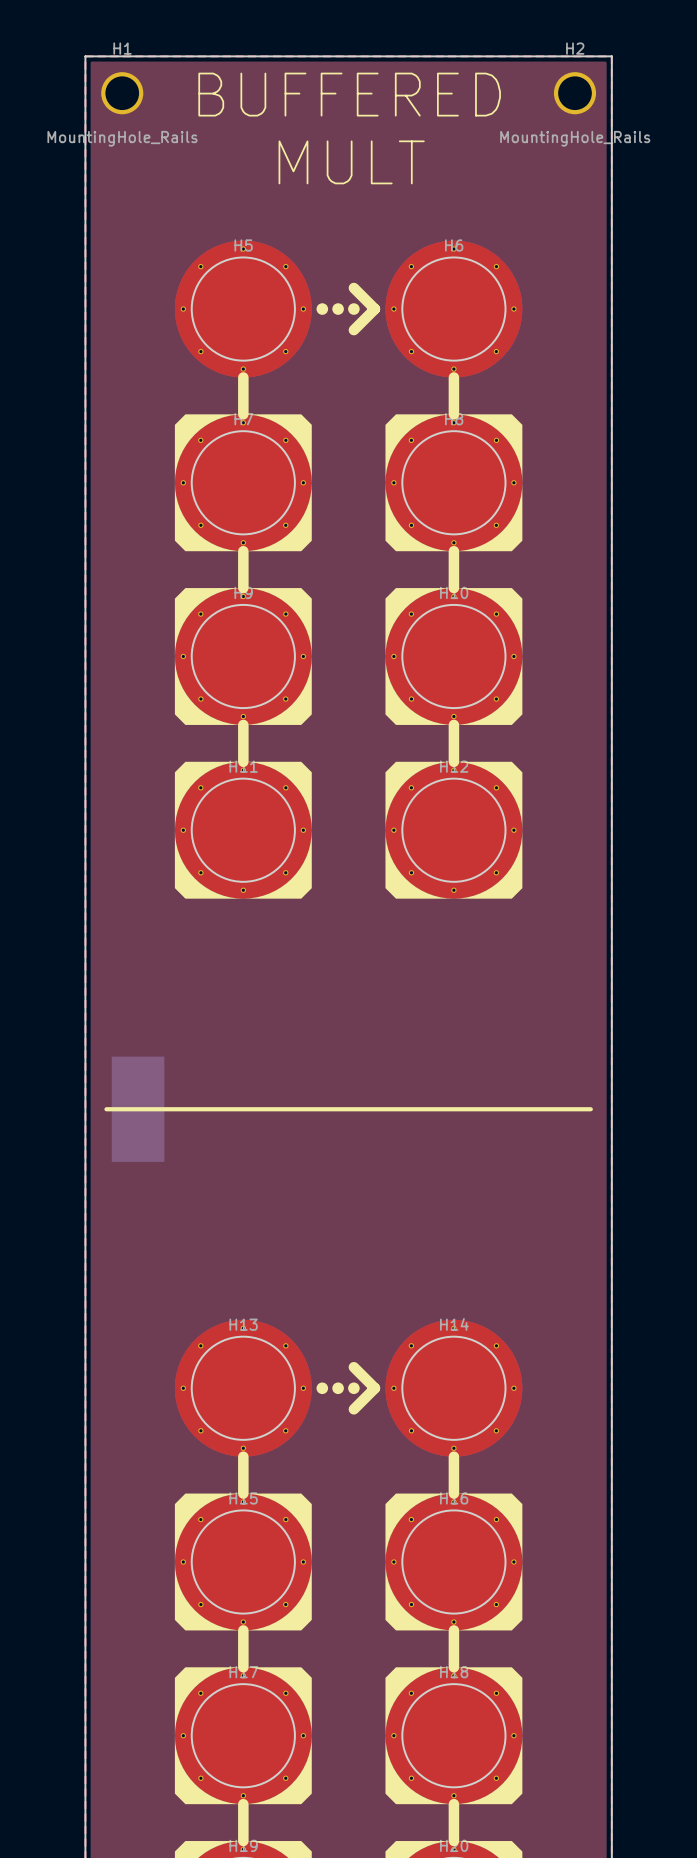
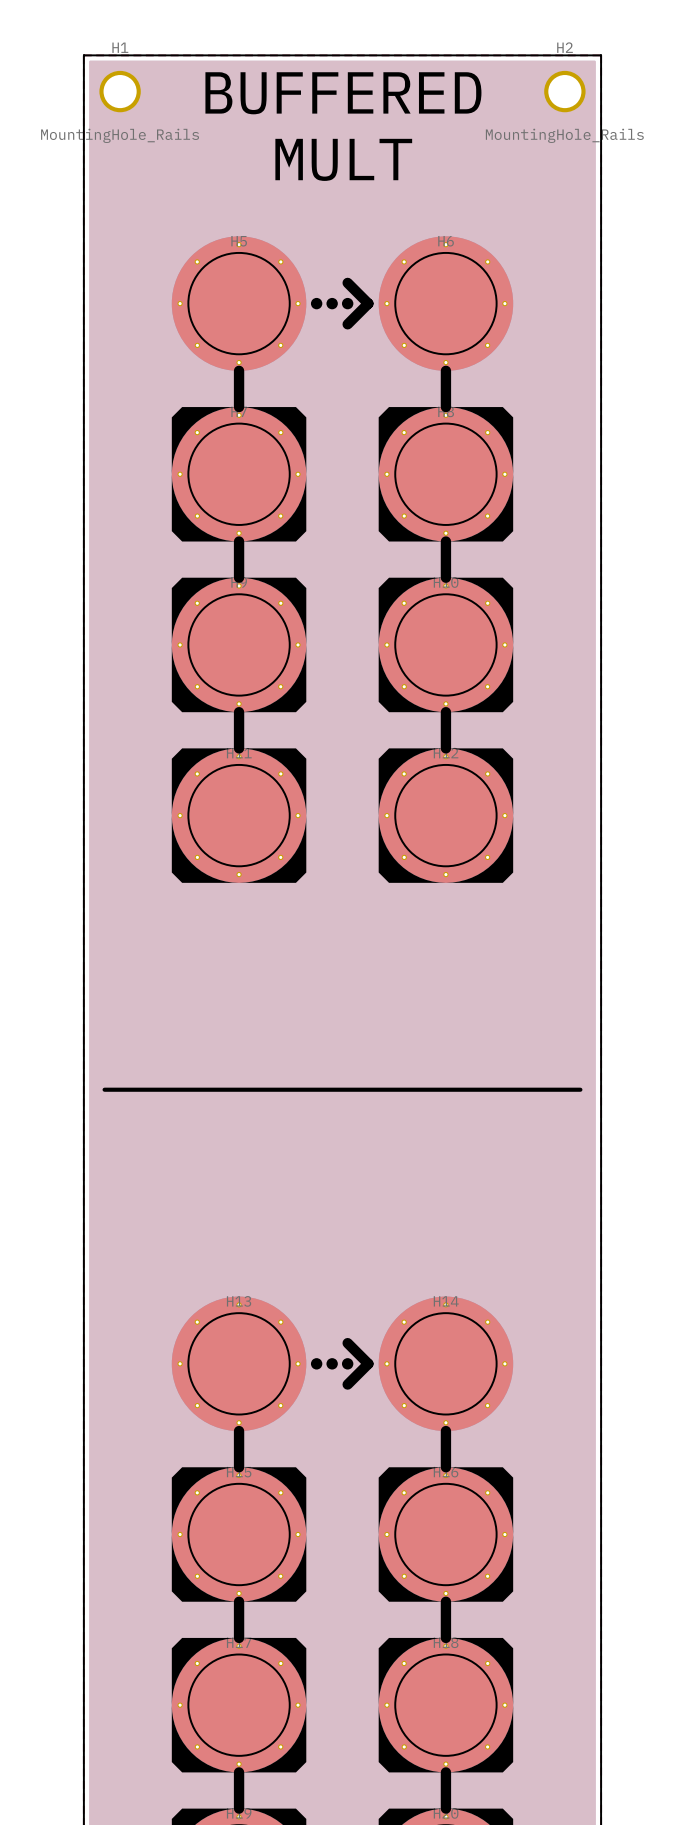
part: (138, 1109) -> none

